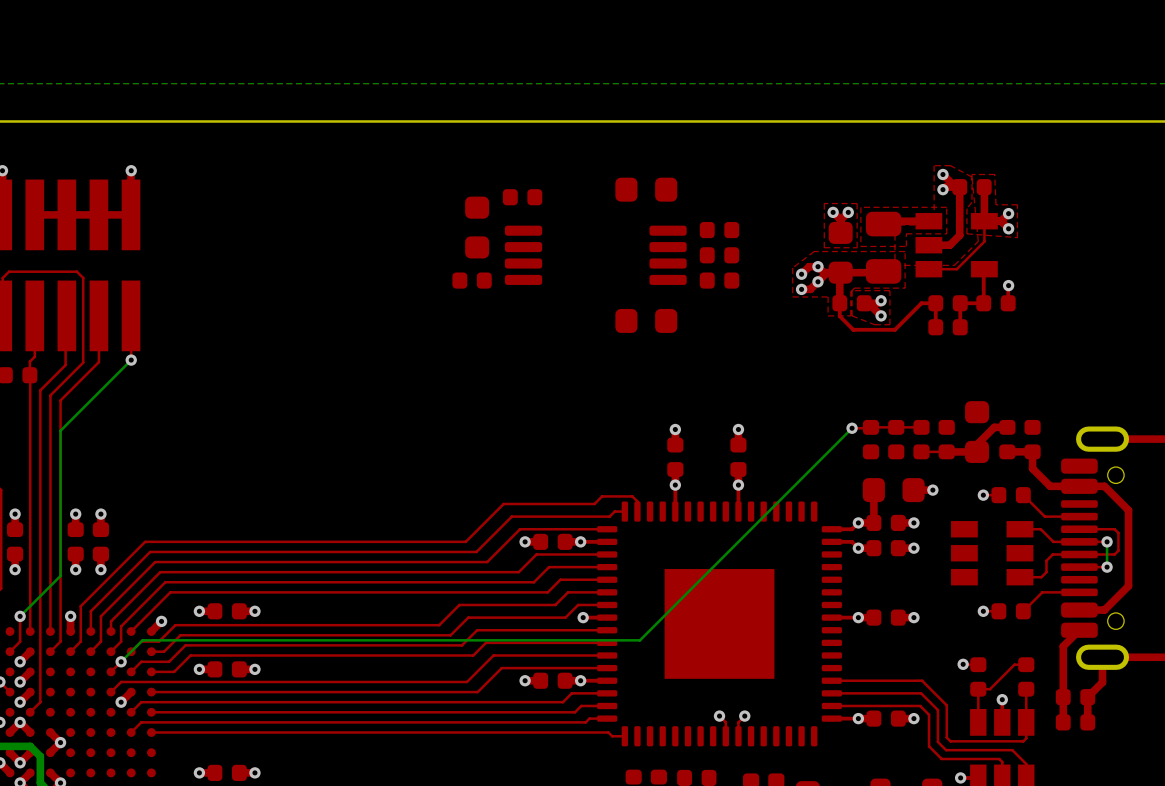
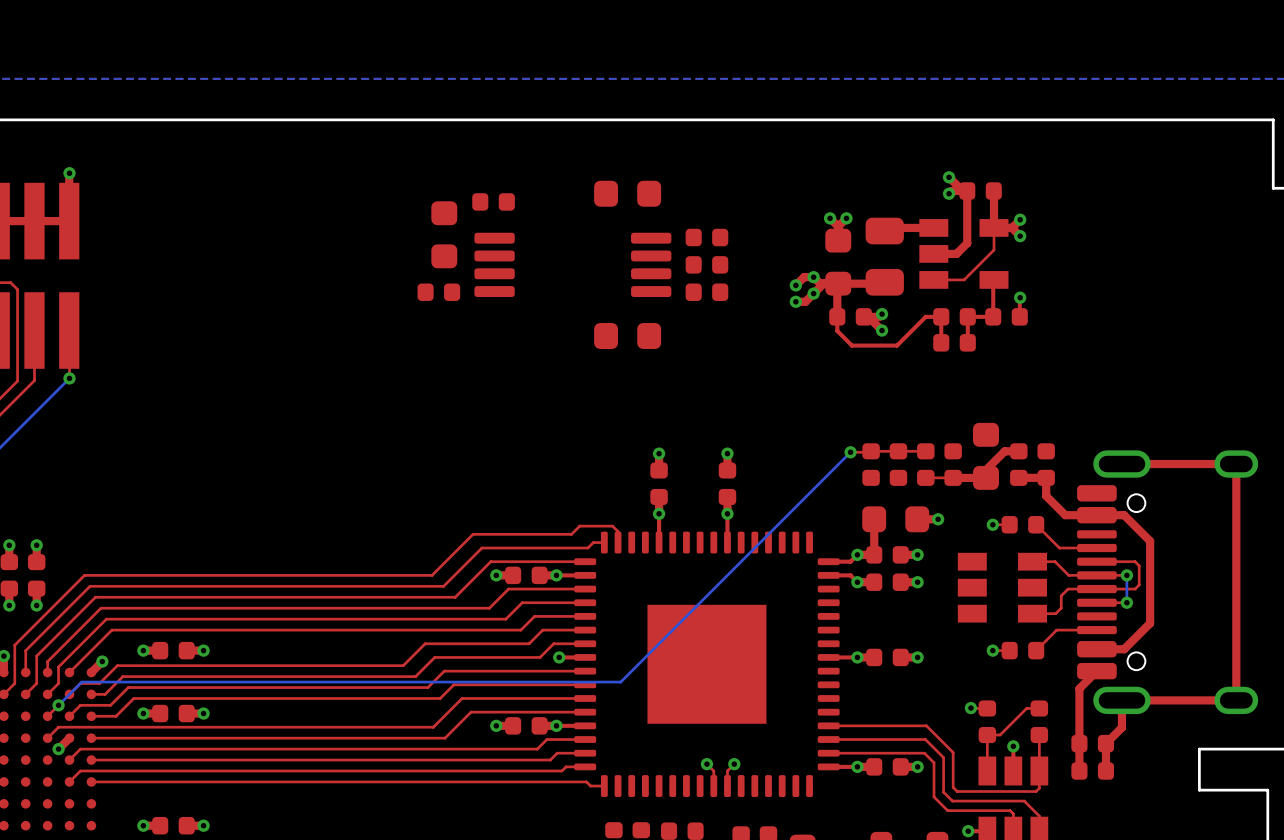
top zone outline: (950, 165) (971, 177) (978, 241) (954, 265) (894, 265) (894, 225) (934, 225) (934, 165) (950, 165) -> none
top zone outline: (994, 174) (995, 204) (1017, 204) (1017, 237) (966, 233) (966, 208) (971, 202) (971, 174) (994, 174) -> none
top zone outline: (857, 203) (857, 247) (824, 247) (824, 203) (857, 203) -> none
top zone outline: (946, 207) (946, 233) (906, 233) (906, 246) (860, 246) (860, 207) (946, 207) -> none
top zone outline: (905, 251) (905, 288) (854, 288) (850, 291) (850, 315) (828, 315) (828, 296) (792, 296) (792, 267) (814, 251) (905, 251) -> none
top zone outline: (889, 290) (889, 324) (874, 324) (852, 315) (852, 290) (889, 290) -> none

